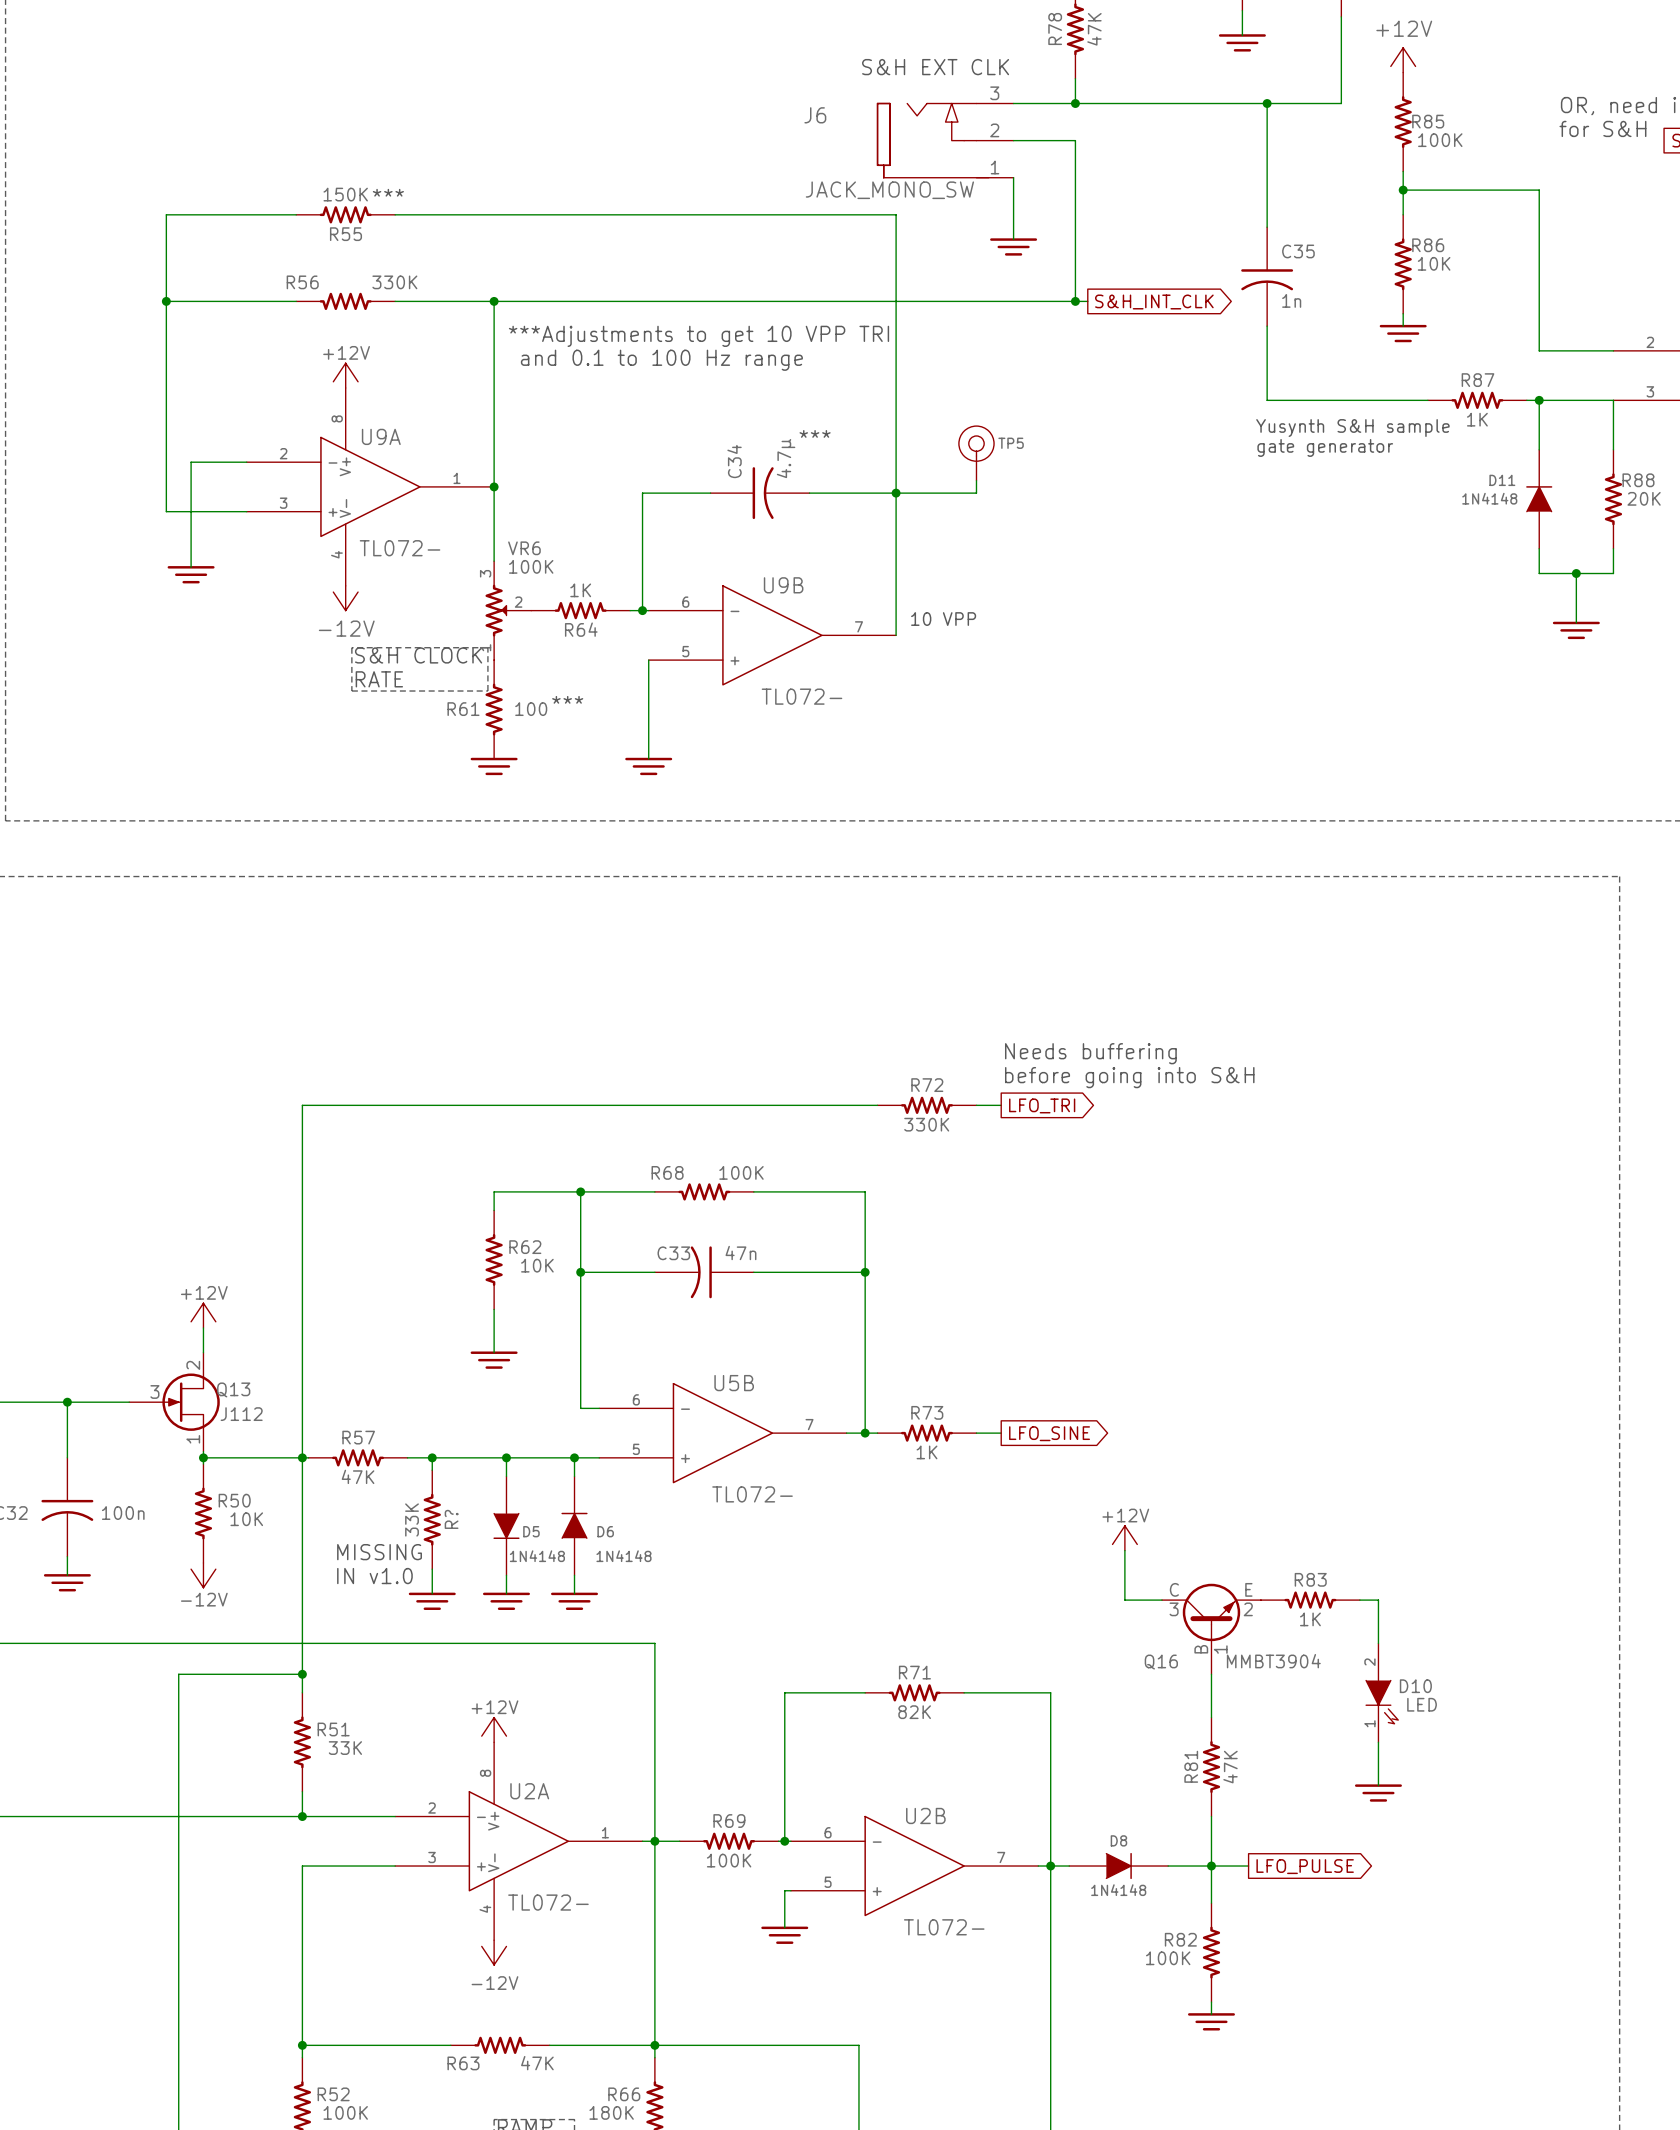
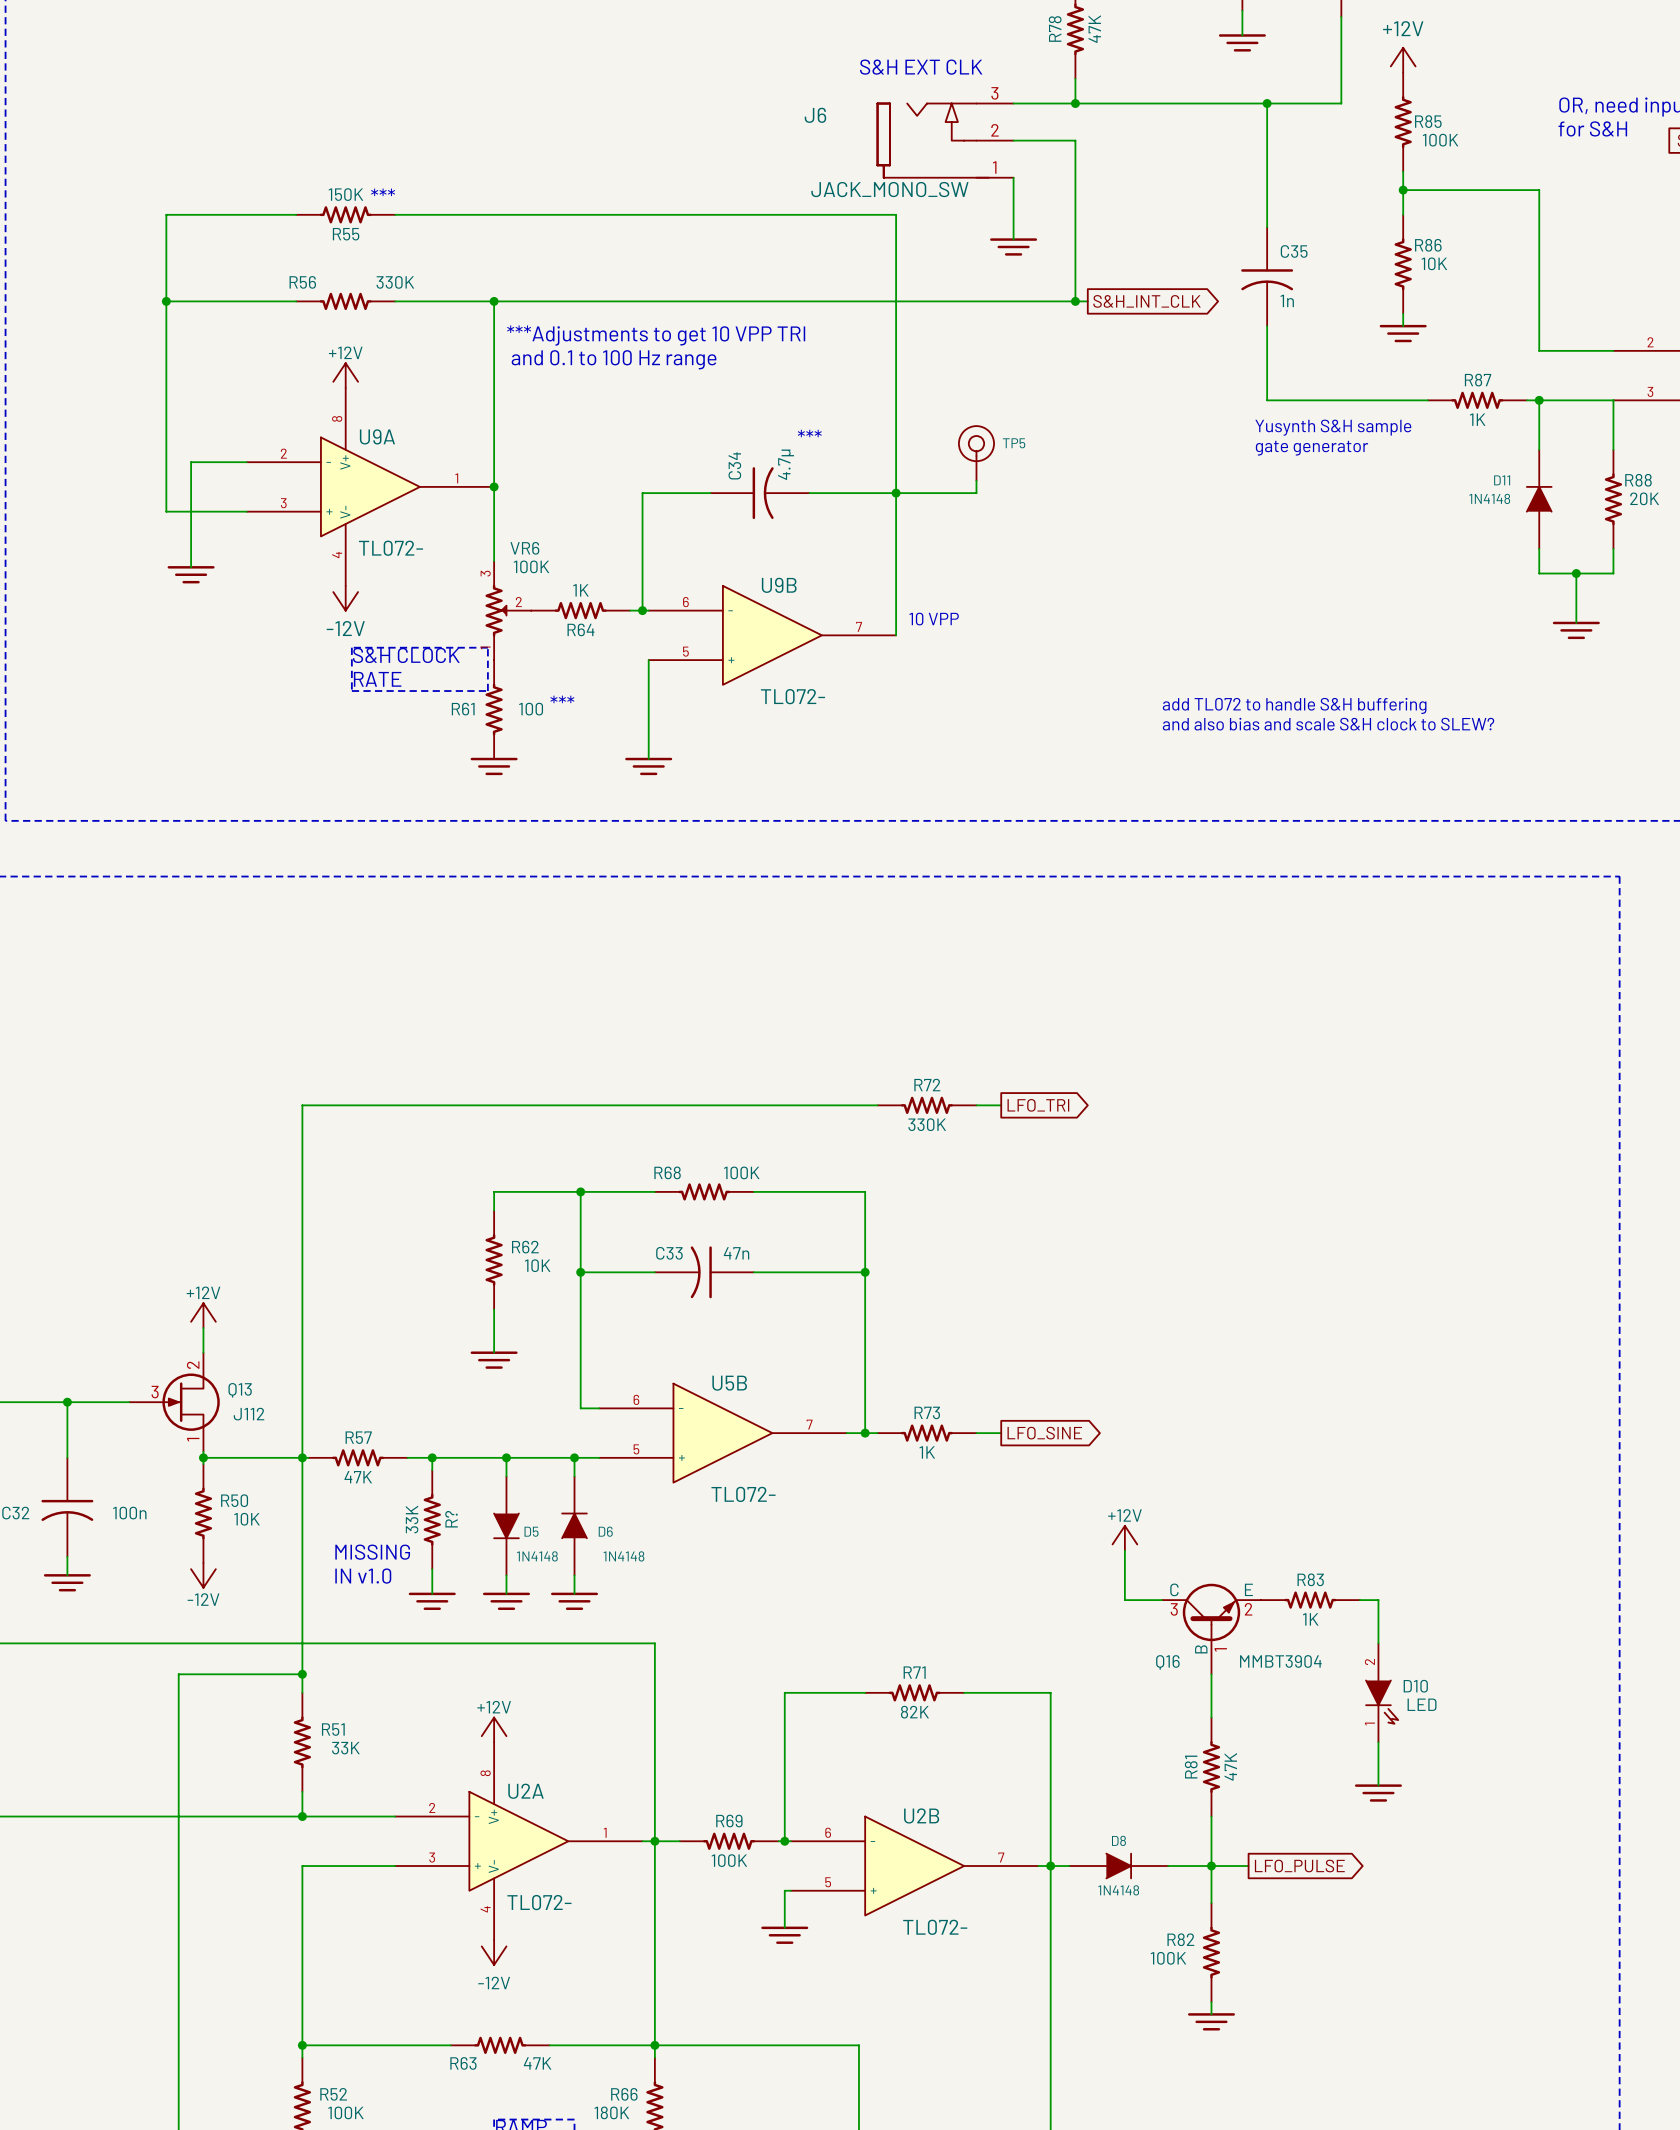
text: none -> add TL072 to handle S&H buffering (1294, 705)
text: none -> and also bias and scale S&H clock to SLEW? (1328, 724)
text: Needs buffering (1090, 1053) -> none
text: before going into S&H (1129, 1077) -> none

